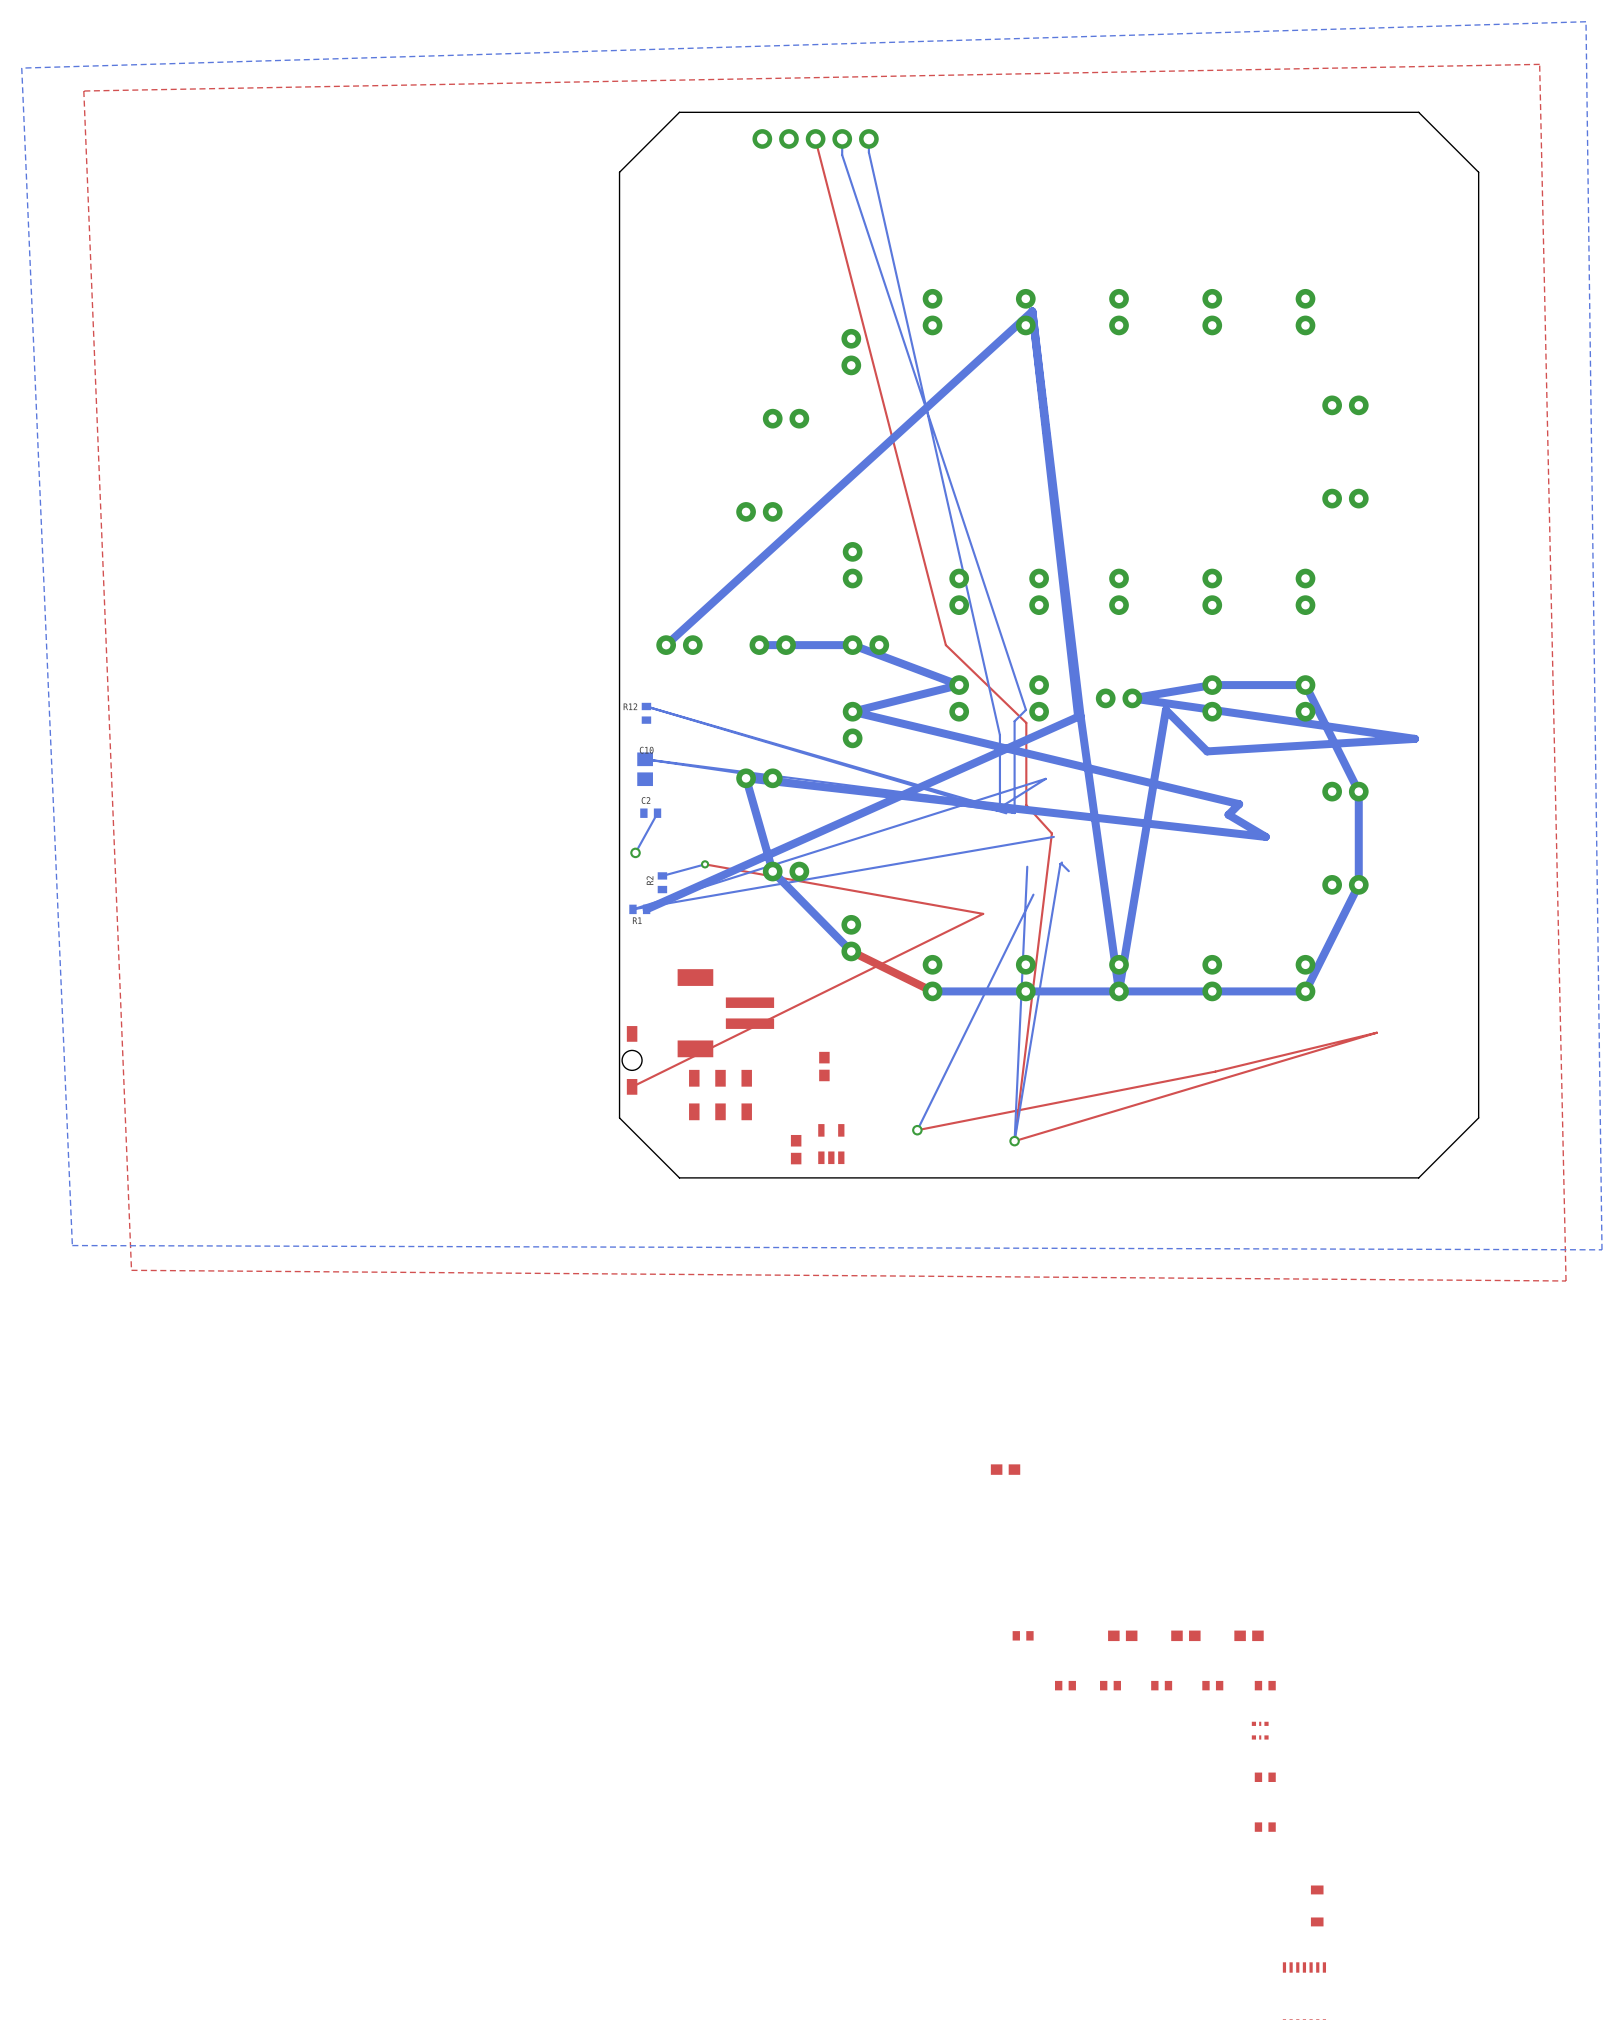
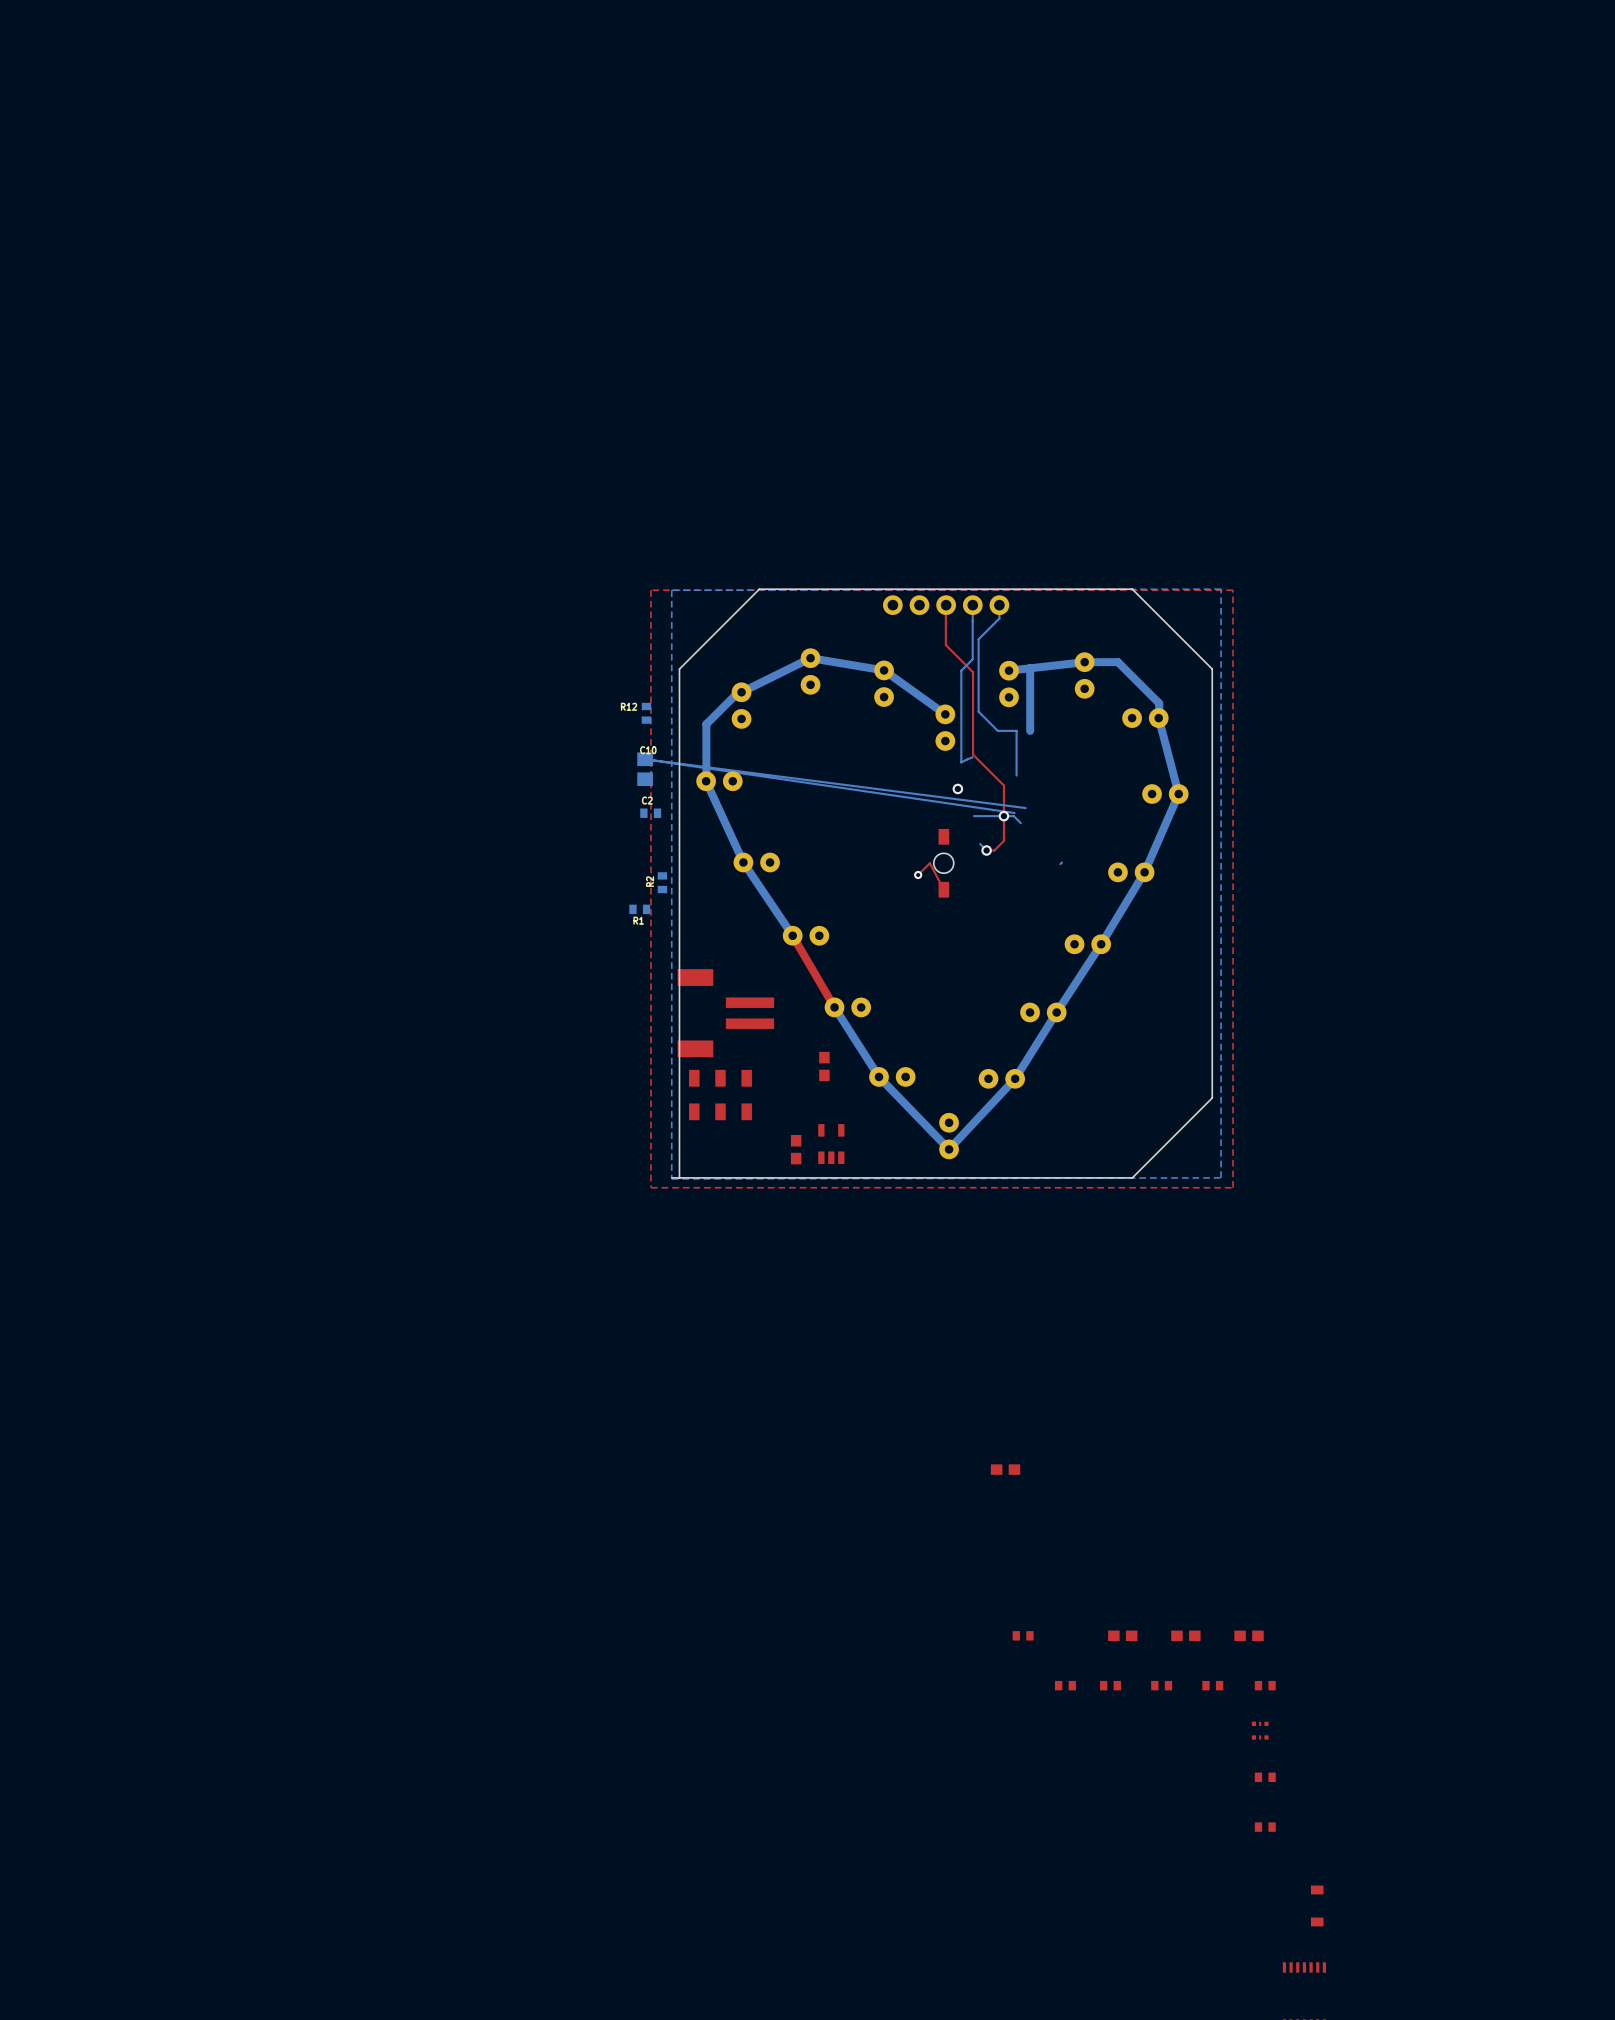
bottom zone outline: (1586, 21) (1601, 1249) (72, 1245) (21, 68) (1586, 21) -> none
top zone outline: (1539, 64) (83, 91) (131, 1270) (1566, 1280) (1539, 64) -> none
top track: (815, 138) (945, 645) (1026, 722) (1026, 805) (1051, 833) (1014, 1141) (1376, 1032) (1215, 1071) (917, 1130) -> none
part: (815, 138) -> none
bottom track: (842, 138) (842, 155) (1025, 709) (1014, 721) (1014, 813) (646, 706) (1006, 813) -> none
bottom track: (868, 138) (868, 152) (999, 735) (999, 807) (1045, 778) (632, 909) (1053, 836) -> none
bottom track: (1032, 311) (666, 645) -> none
bottom track: (1032, 311) (1080, 715) (1119, 991) (1165, 710) (1207, 751) (1414, 738) (1132, 698) (1212, 685) (1305, 685) (1358, 791) (1358, 884) (1305, 991) (932, 991) -> none
bottom track: (1032, 311) (1078, 716) (646, 909) -> none
part: (932, 312) -> none
part: (1025, 312) -> none
part: (1119, 312) -> none
part: (1212, 312) -> none
part: (1305, 312) -> none
part: (851, 352) -> none
part: (1345, 405) -> none
part: (786, 418) -> none
part: (1345, 498) -> none
part: (759, 511) -> none
part: (852, 565) -> none
bottom zone outline: none -> (1221, 589) (1221, 1177) (671, 1178) (671, 590) (1221, 589)
top zone outline: none -> (1233, 590) (650, 590) (650, 1187) (1233, 1187) (1233, 590)
part: (959, 591) -> none
part: (1039, 591) -> none
part: (1119, 591) -> none
part: (1212, 591) -> none
part: (1305, 591) -> none
top track: none -> (946, 605) (945, 645) (973, 672) (973, 754) (1003, 785) (1003, 840) (994, 850) (986, 850)
part: none -> (946, 605)
bottom track: none -> (972, 605) (972, 659) (961, 670) (961, 762) (972, 757)
bottom track: none -> (999, 605) (999, 618) (978, 639) (978, 711) (997, 730) (1016, 730) (1016, 775)
part: (679, 645) -> none
bottom track: (759, 645) (852, 645) (959, 685) (852, 711) (1239, 804) (1228, 814) (1265, 836) (746, 778) (772, 871) (851, 951) -> none
part: (772, 645) -> none
part: (865, 645) -> none
bottom track: none -> (1029, 668) (1030, 730)
bottom track: none -> (1009, 670) (1084, 662) (1117, 662) (1159, 703) (1158, 718) (1178, 794) (1144, 872) (1015, 1078) (949, 1149) (879, 1076) (834, 1007)
part: none -> (810, 671)
part: none -> (1084, 675)
part: none -> (884, 683)
part: none -> (1009, 684)
part: (959, 698) -> none
part: (1039, 698) -> none
part: (1119, 698) -> none
part: (1212, 698) -> none
part: (1305, 698) -> none
part: none -> (741, 705)
bottom track: none -> (945, 714) (884, 670) (810, 658) (738, 692) (706, 724) (706, 781) (743, 862) (792, 935)
part: none -> (1145, 718)
part: (852, 725) -> none
part: none -> (945, 727)
part: (759, 778) -> none
part: none -> (719, 781)
via: none -> (957, 788)
part: (1345, 791) -> none
part: none -> (1165, 794)
bottom track: (657, 813) (635, 852) -> none
bottom track: none -> (974, 816) (1013, 816) (1020, 823)
via: none -> (1003, 816)
bottom track: none -> (980, 844) (986, 850)
via: none -> (986, 850)
via: (635, 852) -> none
part: none -> (943, 863)
bottom track: (705, 864) (662, 875) -> none
top track: (705, 864) (983, 913) (632, 1086) -> none
via: (705, 864) -> none
bottom track: (1027, 866) (1014, 1141) (1060, 864) (1068, 871) -> none
part position: (786, 871) -> (756, 862)
part: none -> (1131, 872)
top track: none -> (918, 875) (929, 863) (943, 889)
via: none -> (918, 875)
part: (1345, 884) -> none
bottom track: (1033, 894) (917, 1130) -> none
top track: none -> (792, 935) (834, 1007)
part: none -> (806, 935)
part: (851, 938) -> none
part: none -> (1087, 944)
top track: (851, 951) (932, 991) -> none
part: (932, 978) -> none
part: (1025, 978) -> none
part: (1119, 978) -> none
part: (1212, 978) -> none
part: (1305, 978) -> none
part: none -> (847, 1007)
part: none -> (1043, 1012)
part: (632, 1060) -> none
part: none -> (892, 1076)
part: none -> (1001, 1078)
via: (917, 1130) -> none
part: none -> (949, 1136)
via: (1014, 1141) -> none
board edge: (1132, 1177) (1418, 1177) (1478, 1117) (1478, 172) (1418, 112) (679, 112) (619, 172) (619, 1117) (679, 1177) -> (1132, 1177) (1212, 1097) (1212, 669) (1132, 589) (759, 589) (679, 669) (679, 1177) (671, 1177)

